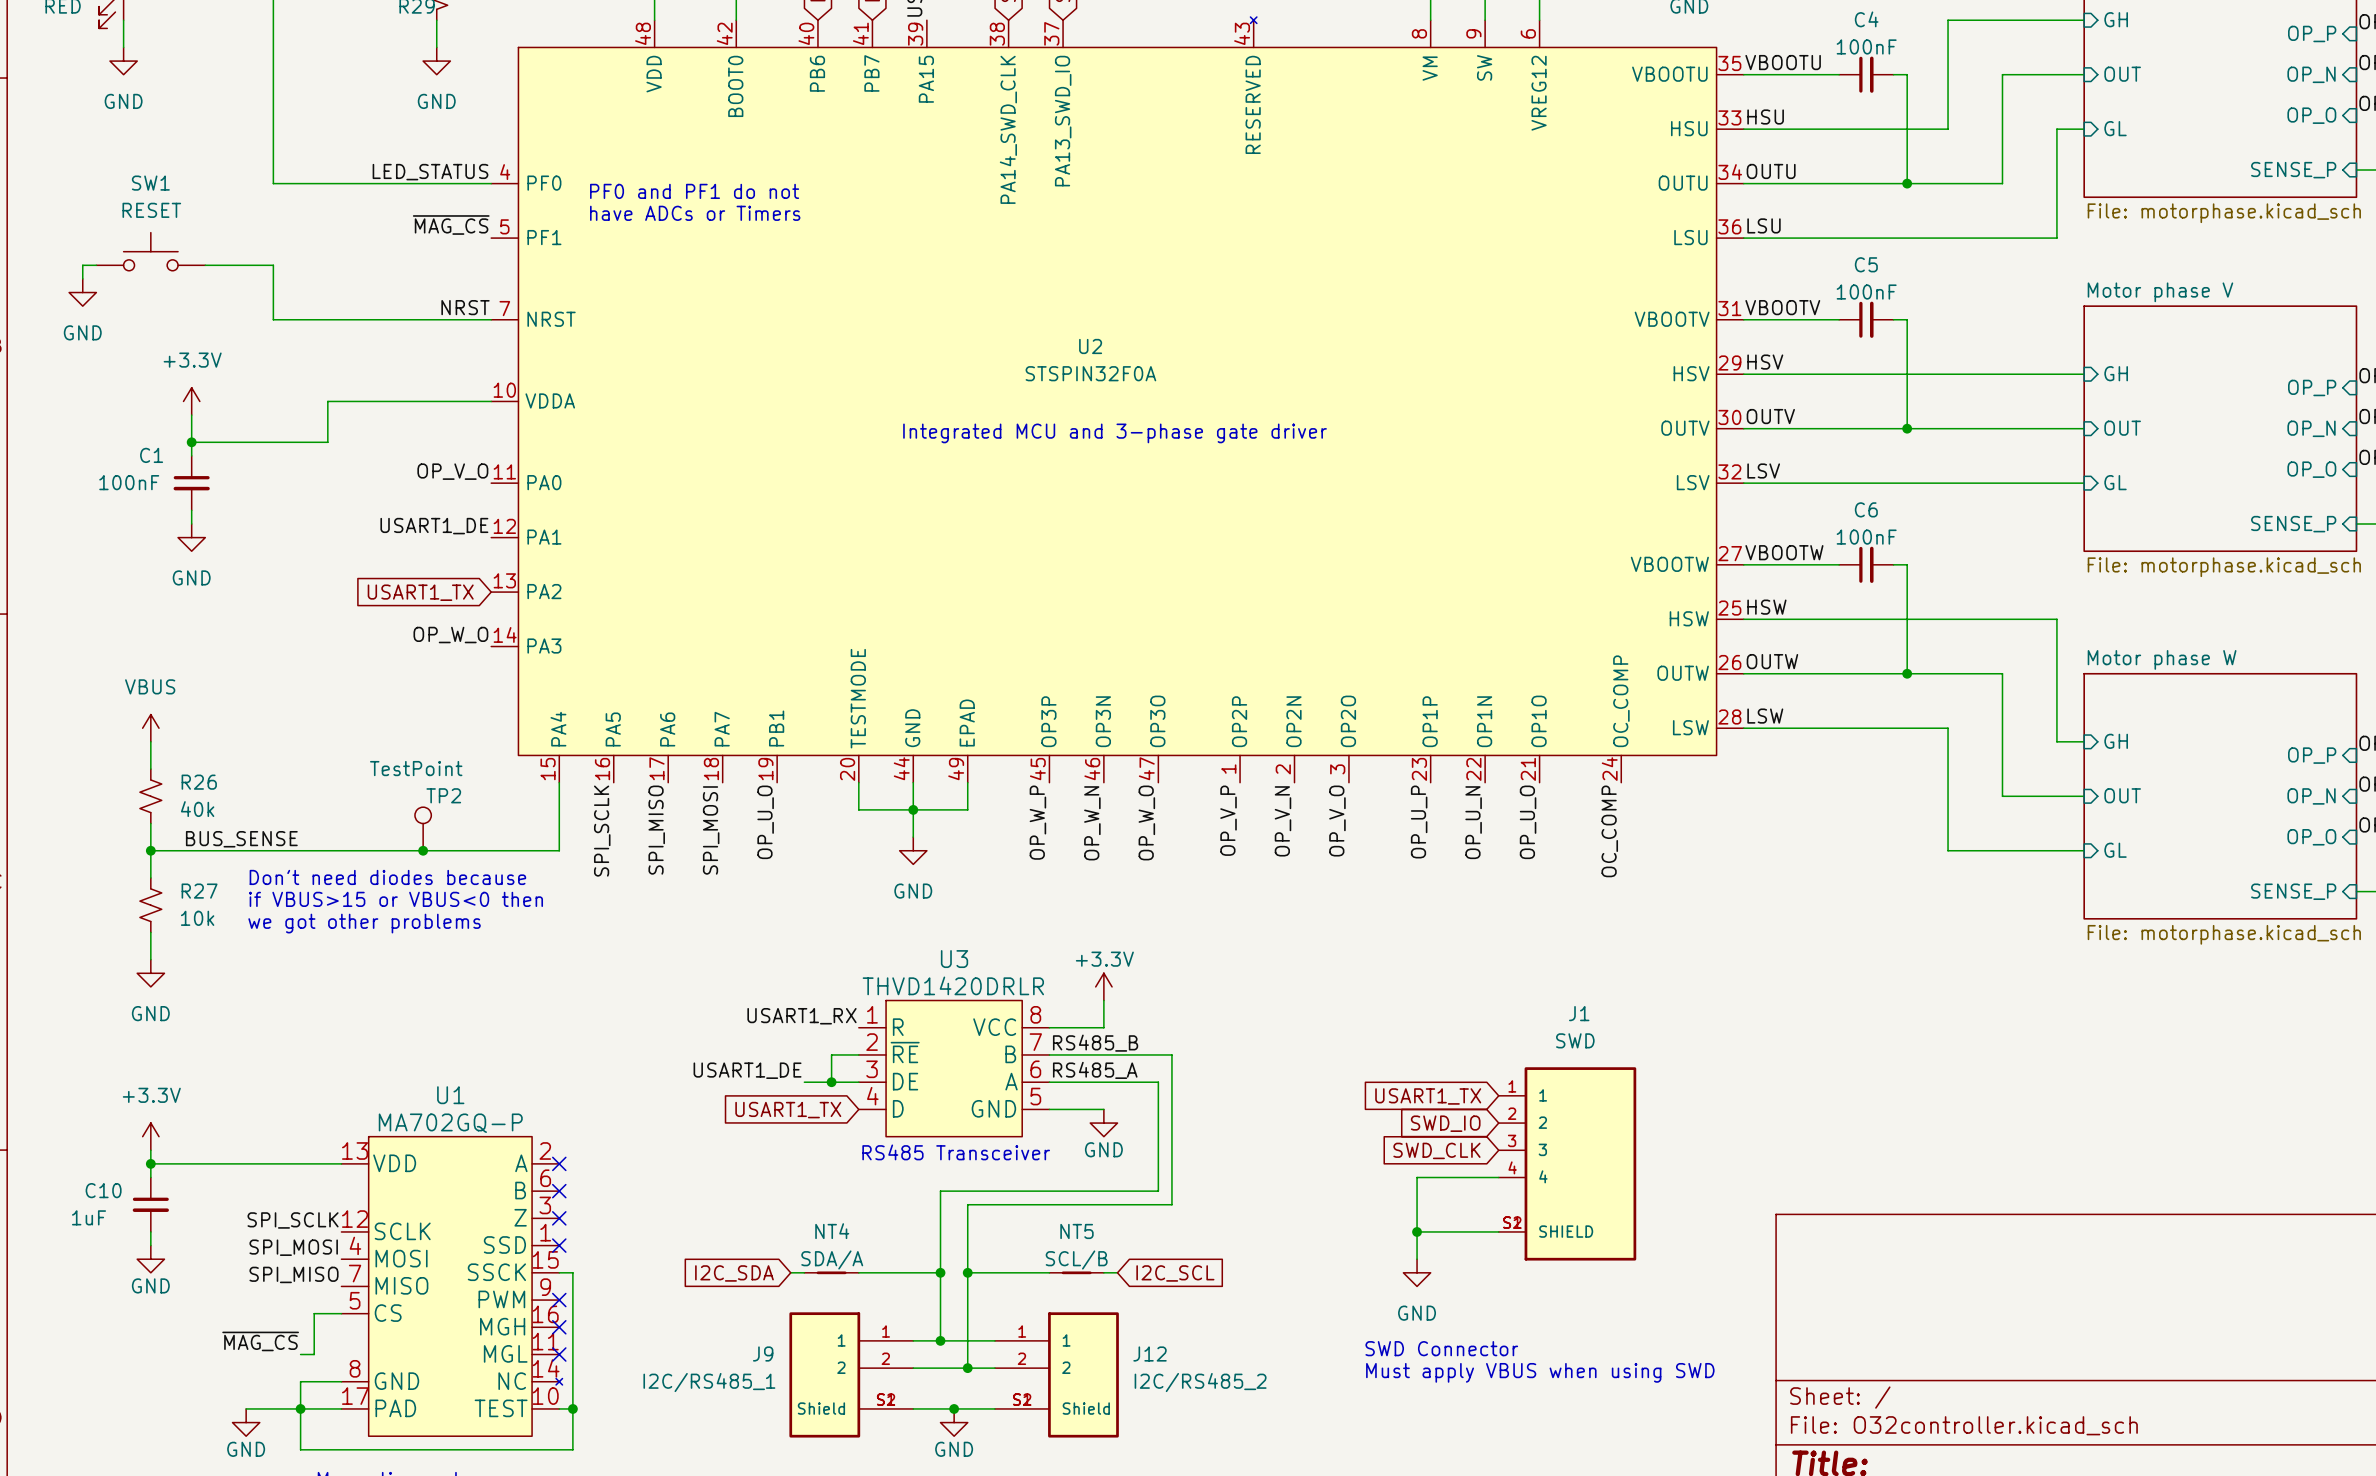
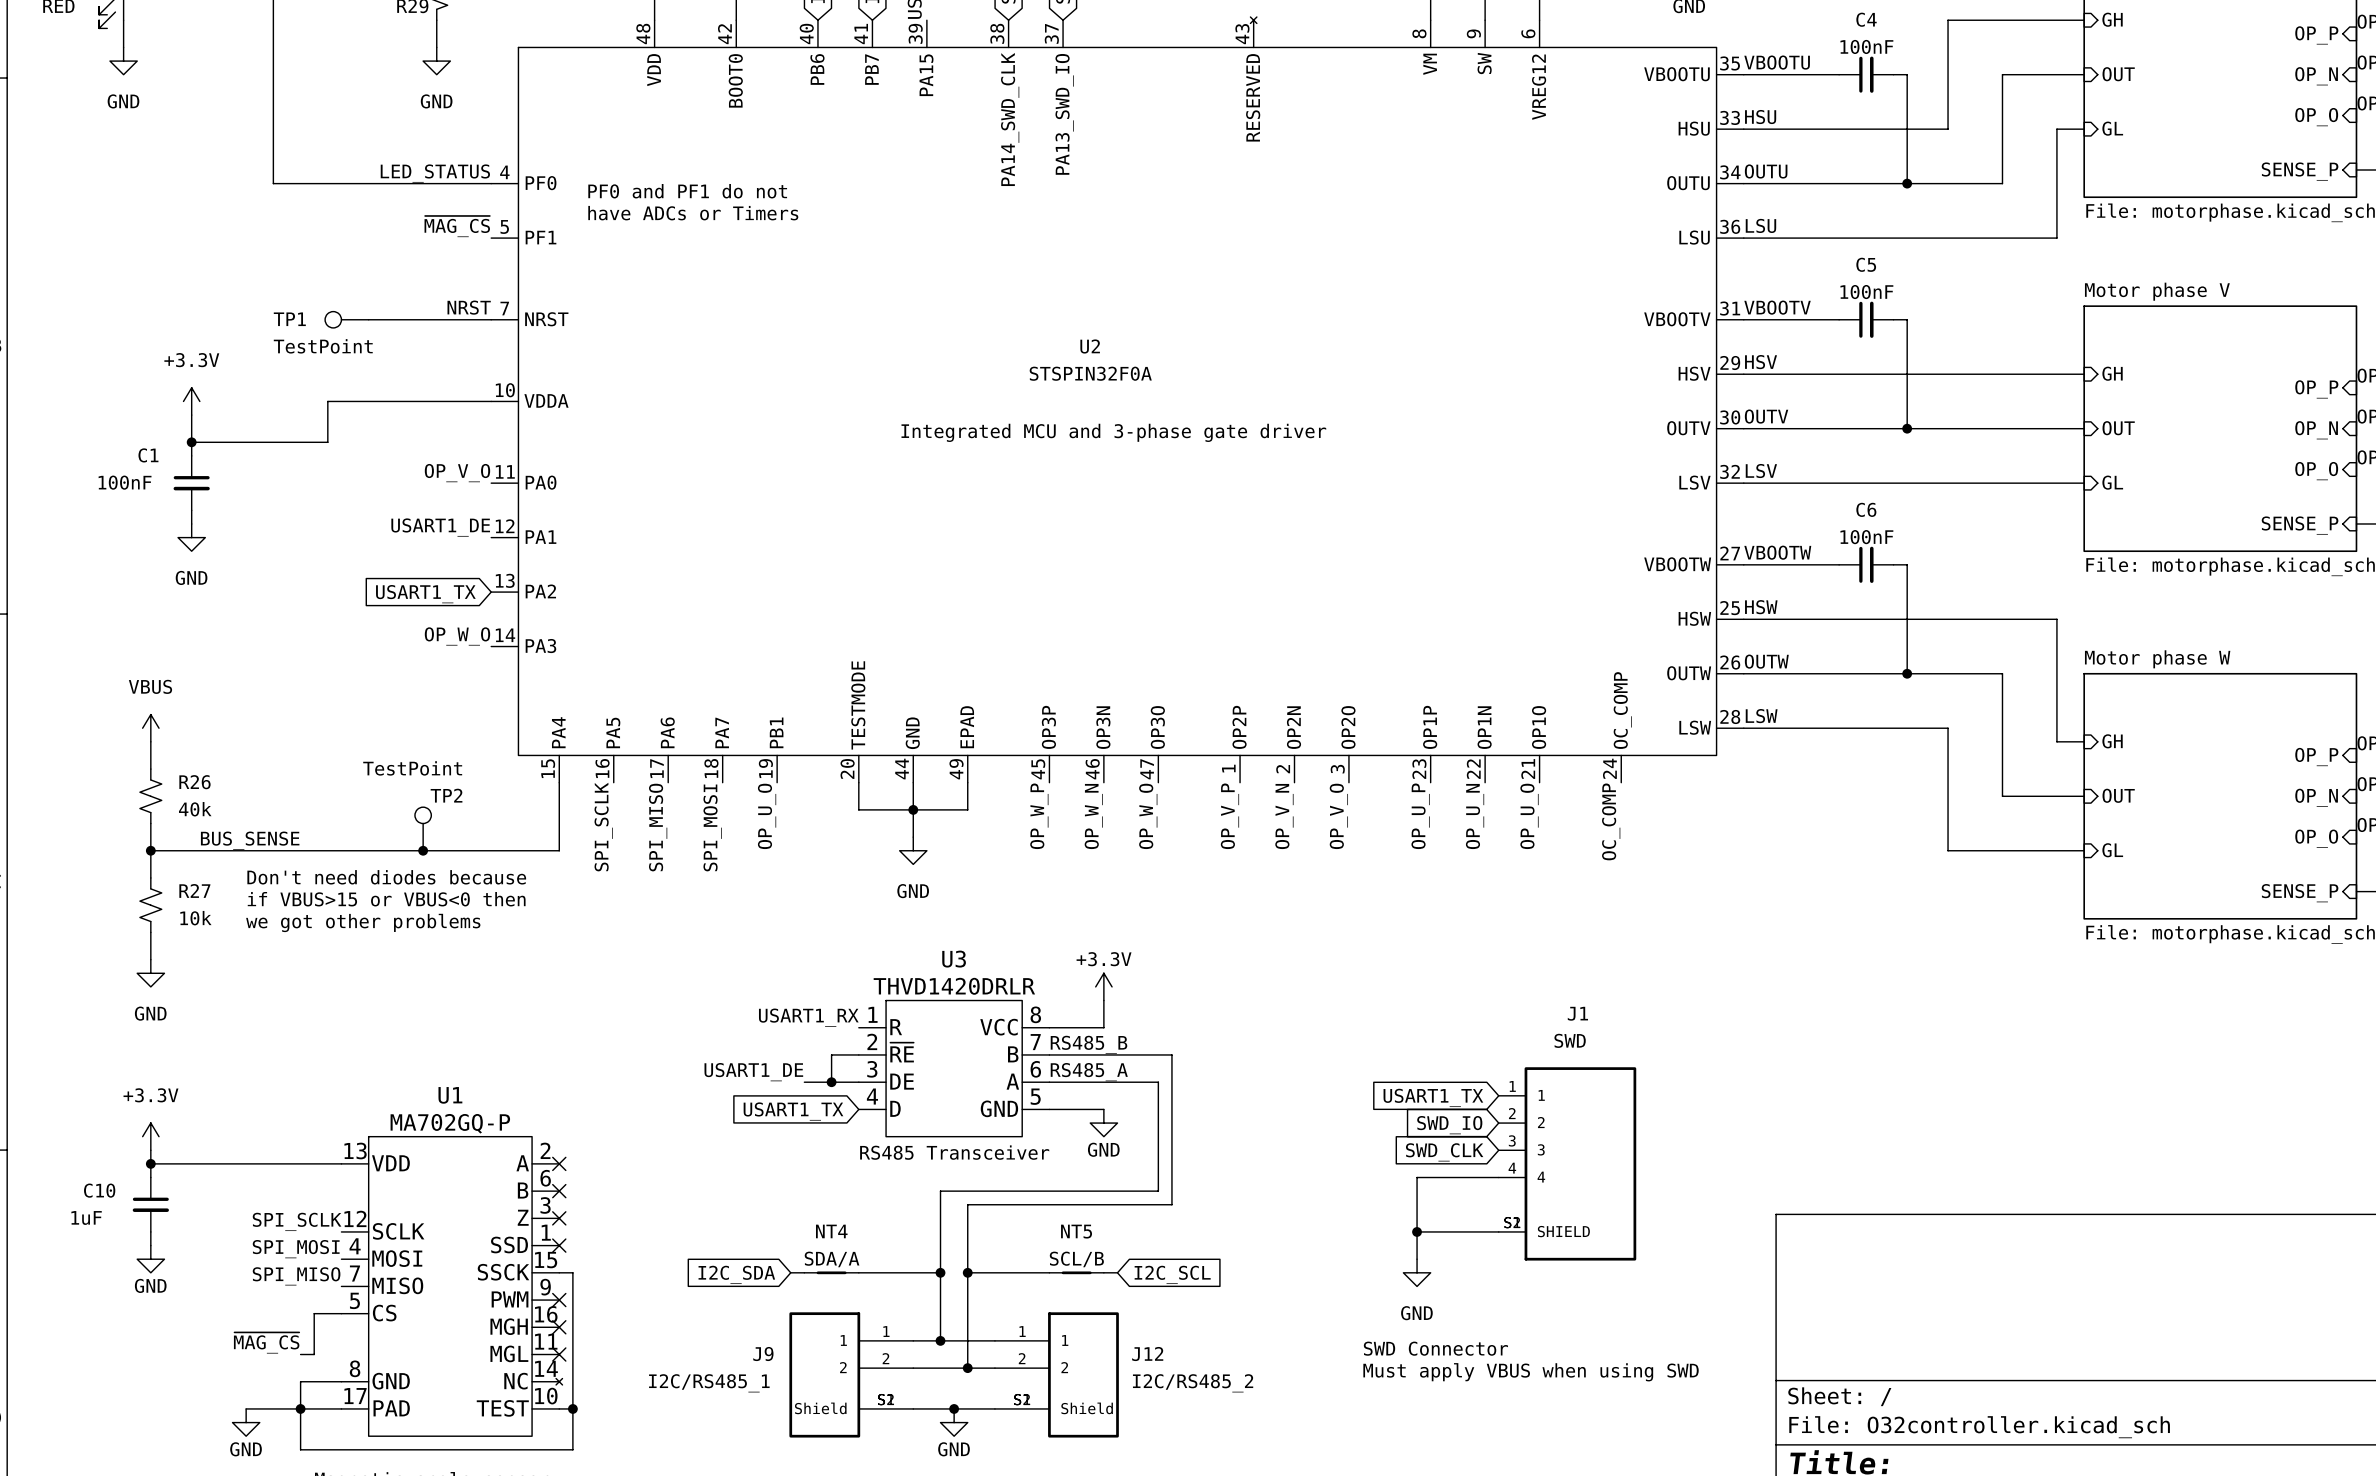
SW1: RESET (150, 251) -> none
wire: (96, 265) (82, 265) (82, 278) -> none
wire: (205, 265) (273, 265) (273, 319) (368, 319) -> none
power symbol: GND (82, 292) -> none
TP1: none -> TestPoint (346, 319)

